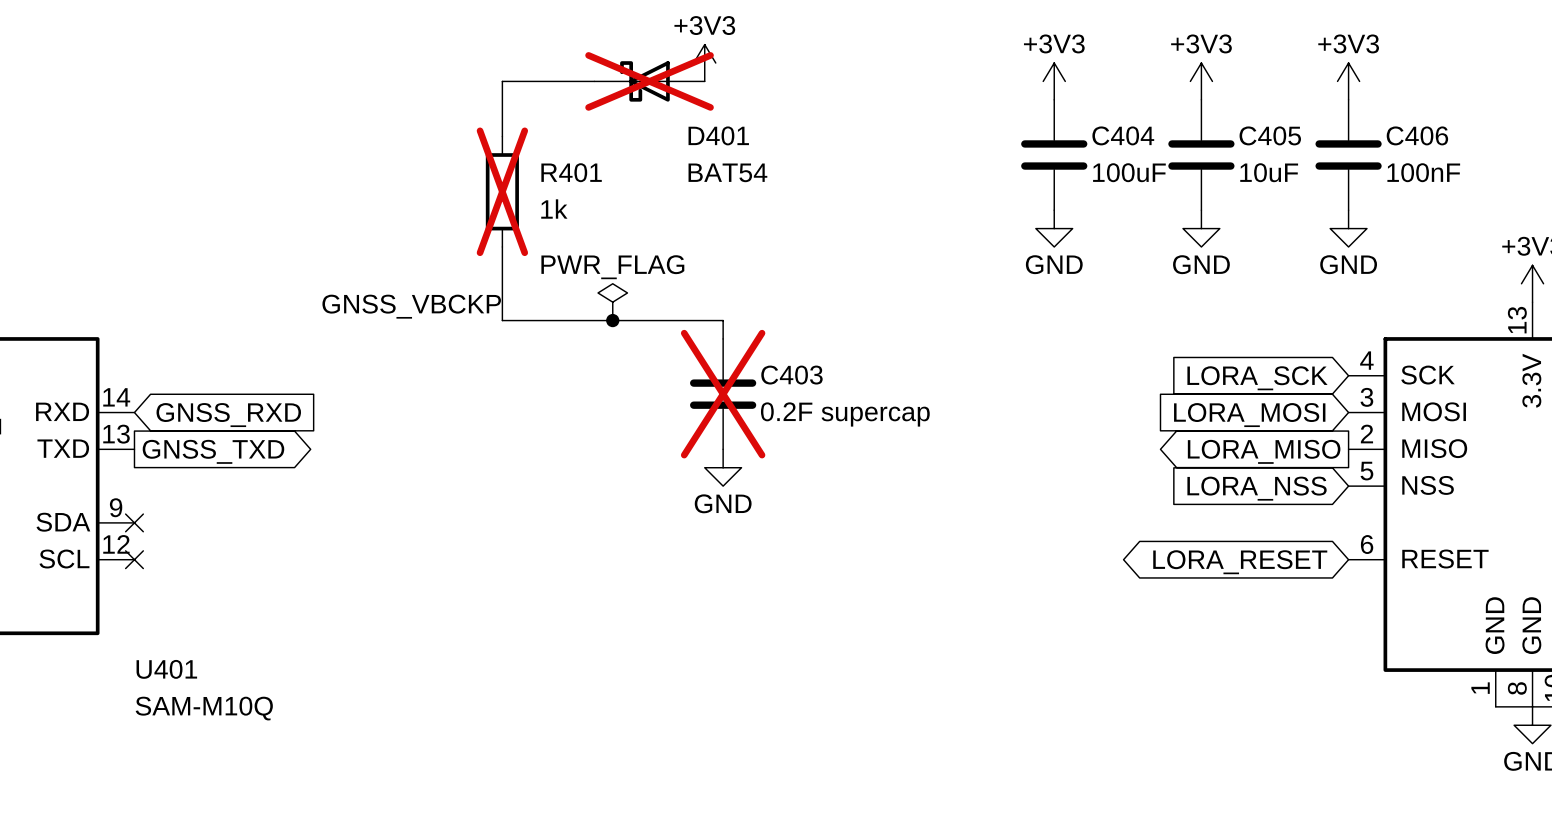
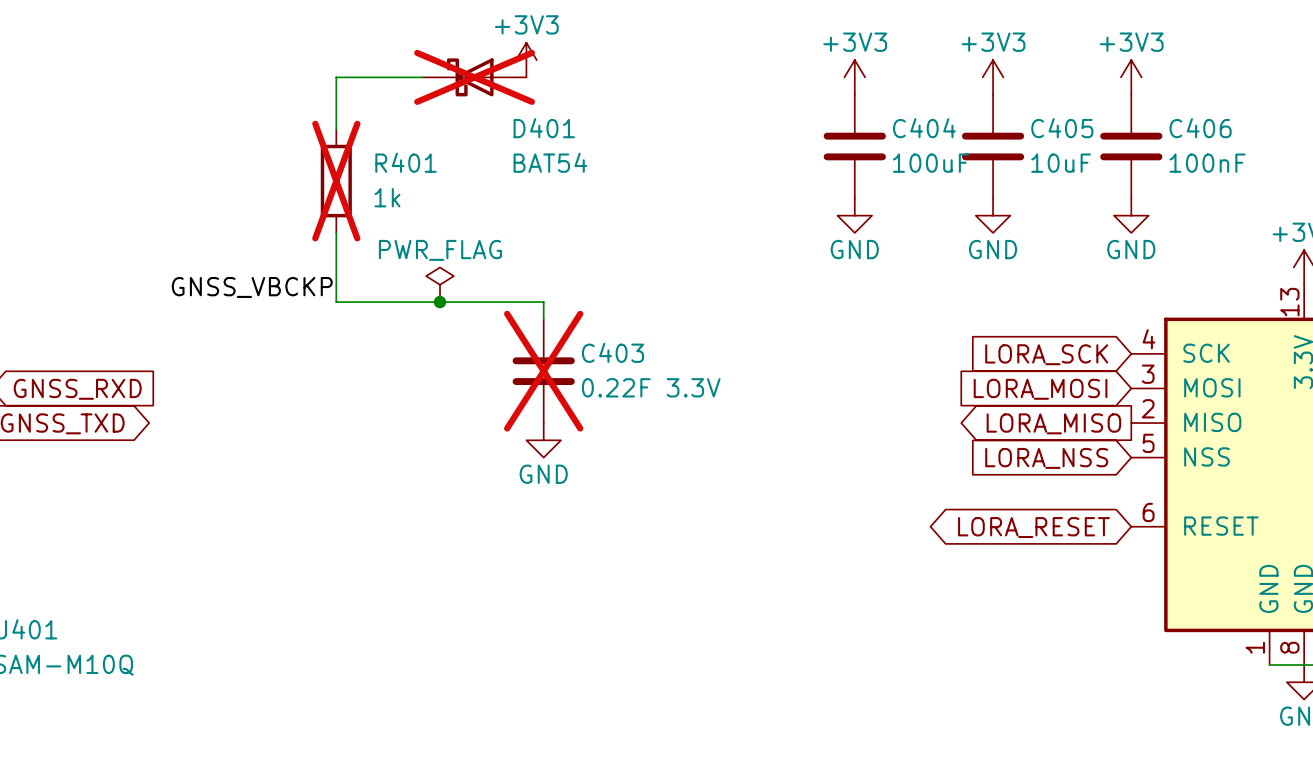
C403 value: 0.2F supercap (845, 414) -> 0.22F 3.3V (651, 387)

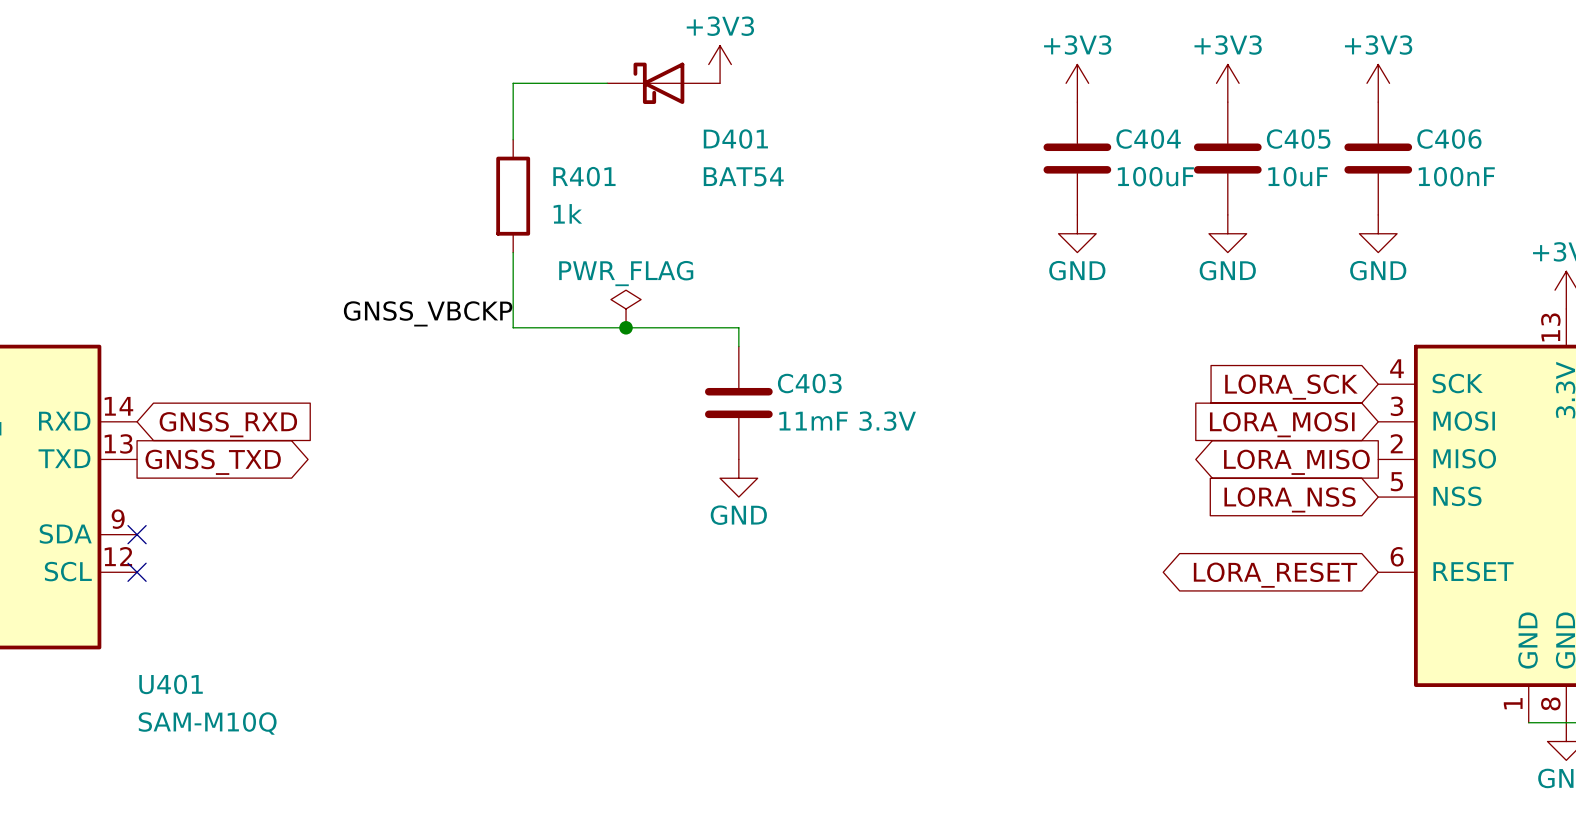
D401 do-not-place cross: (474, 77) -> none
R401 do-not-place cross: (336, 181) -> none
C403 do-not-place cross: (543, 371) -> none
C403 value: 0.22F 3.3V (651, 387) -> 11mF 3.3V (847, 421)

